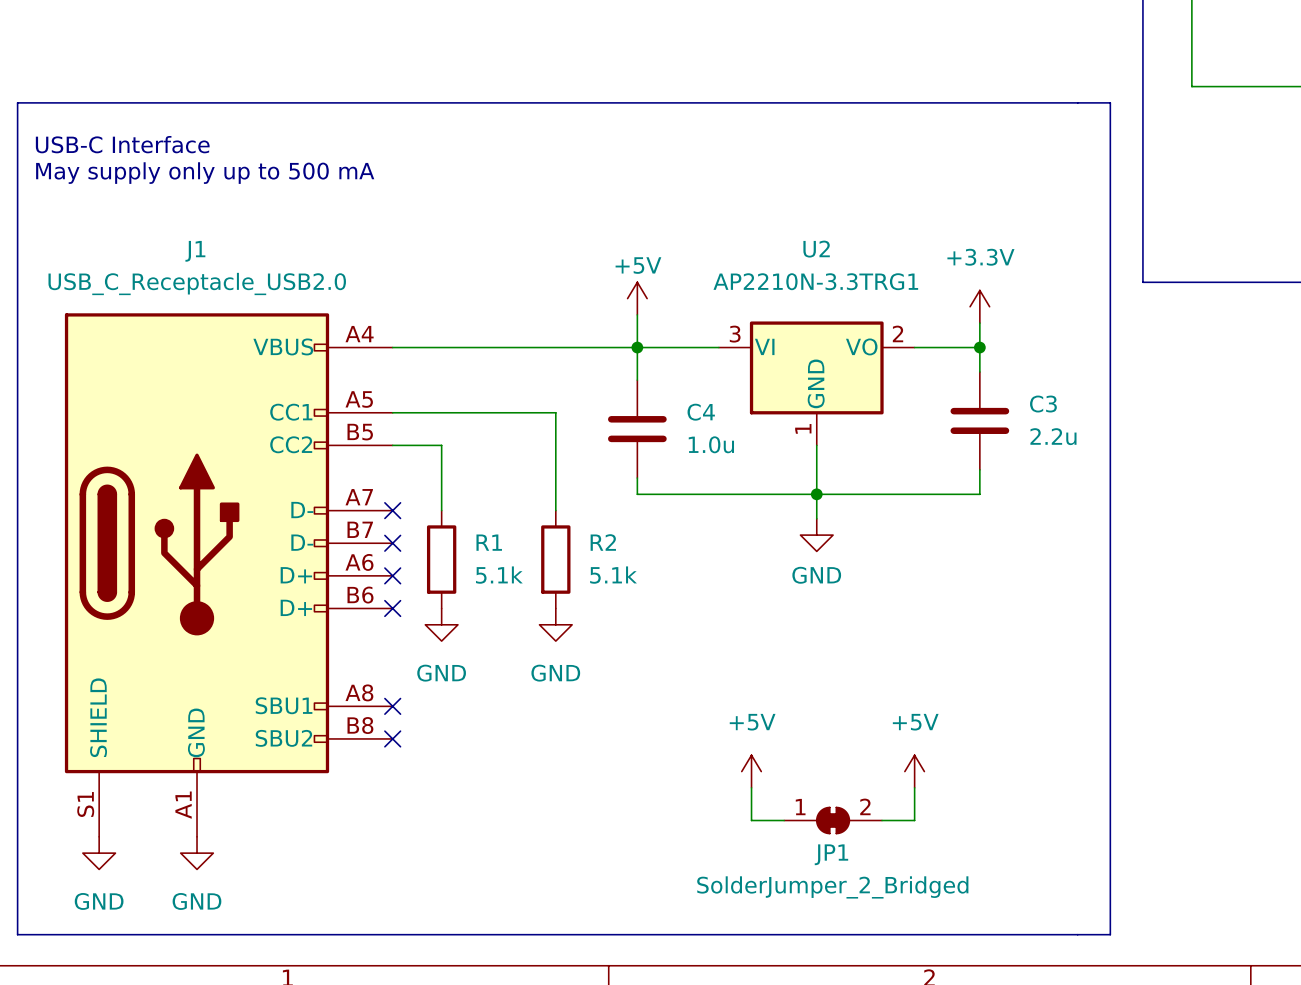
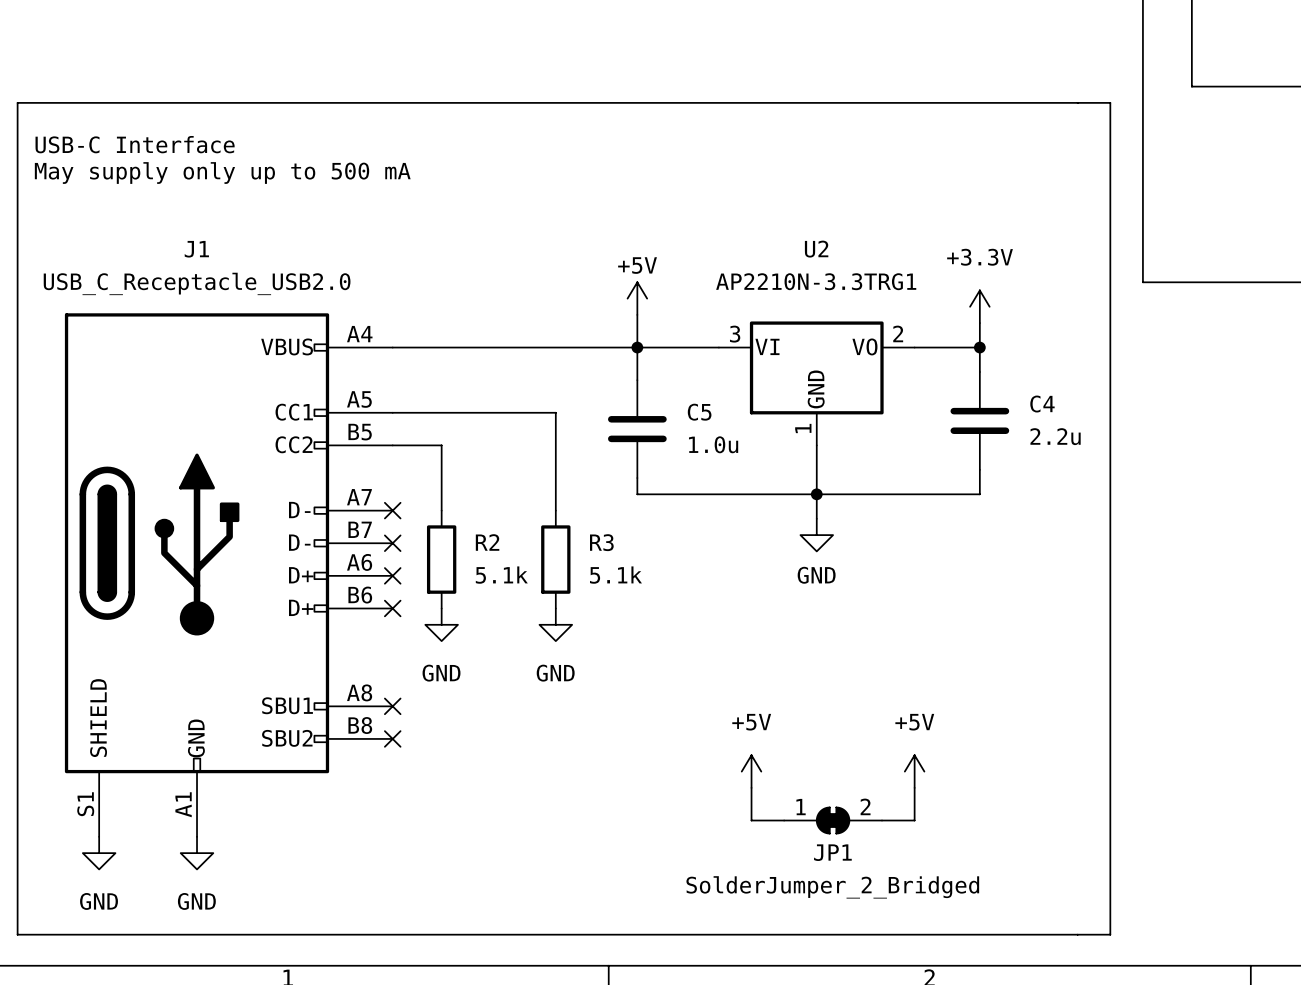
C3 name: C3 (1043, 404) -> C4 (1042, 404)
C4 name: C4 (701, 412) -> C5 (699, 412)
R1 name: R1 (489, 542) -> R2 (487, 542)
R2 name: R2 (603, 542) -> R3 (601, 542)

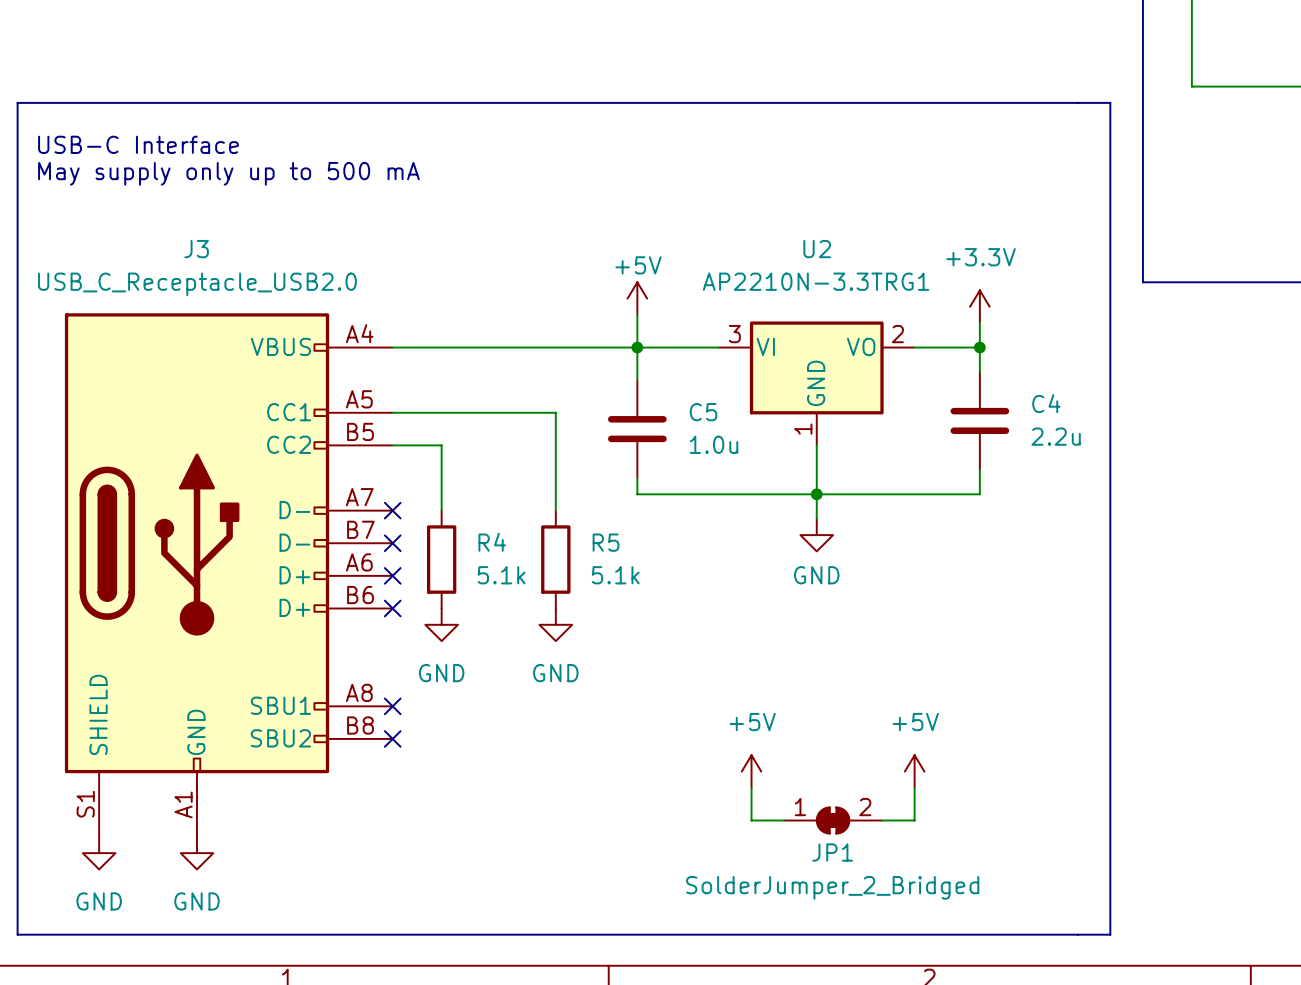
J1 name: J1 (196, 249) -> J3 (196, 249)
R2 name: R2 (487, 542) -> R4 (492, 542)
R3 name: R3 (601, 542) -> R5 (606, 542)

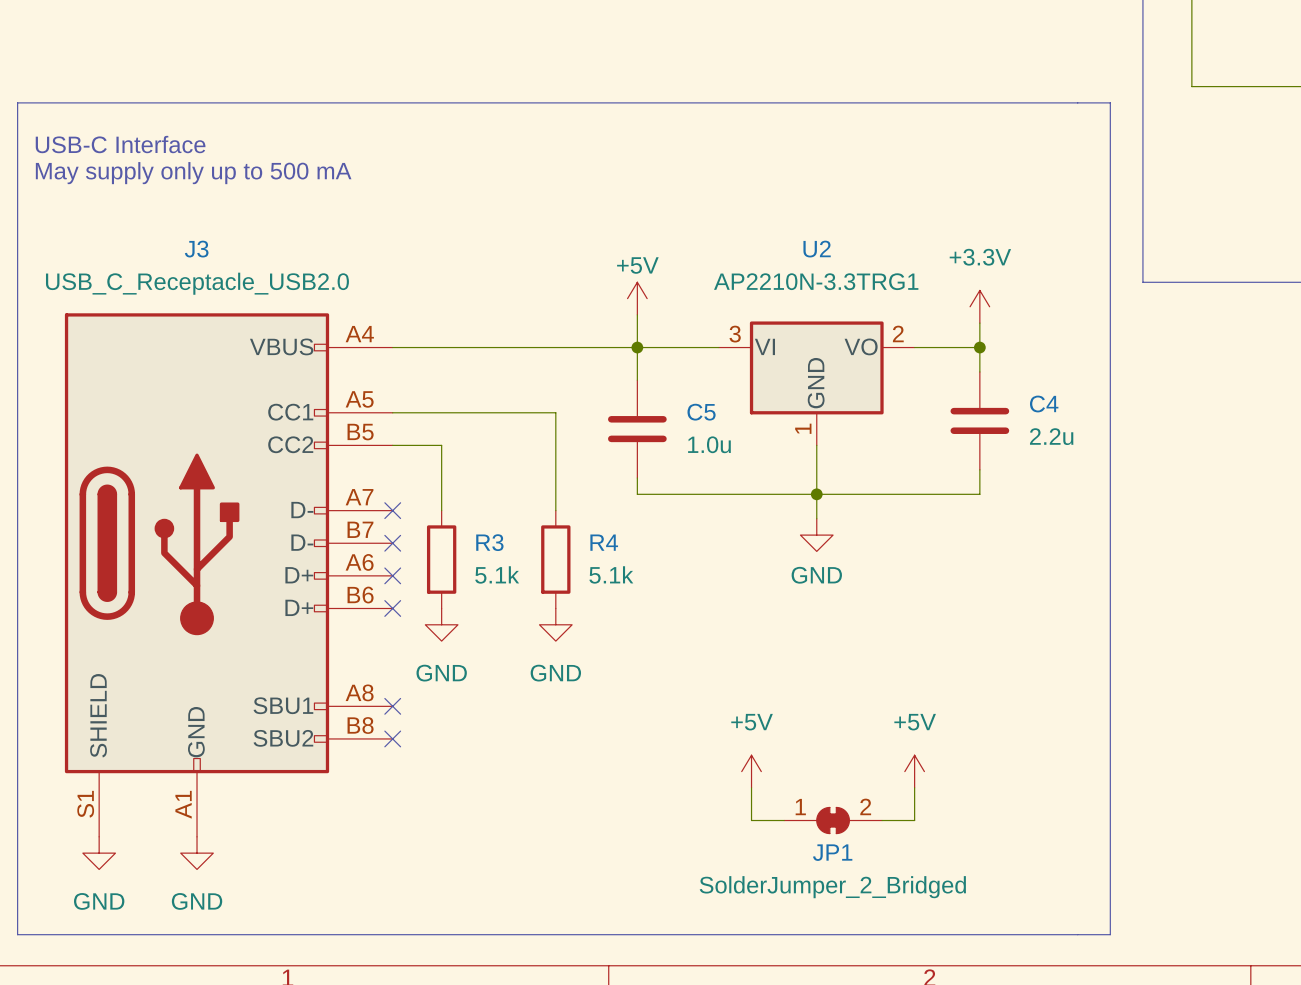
R4 name: R4 (492, 542) -> R3 (489, 542)
R5 name: R5 (606, 542) -> R4 (604, 542)

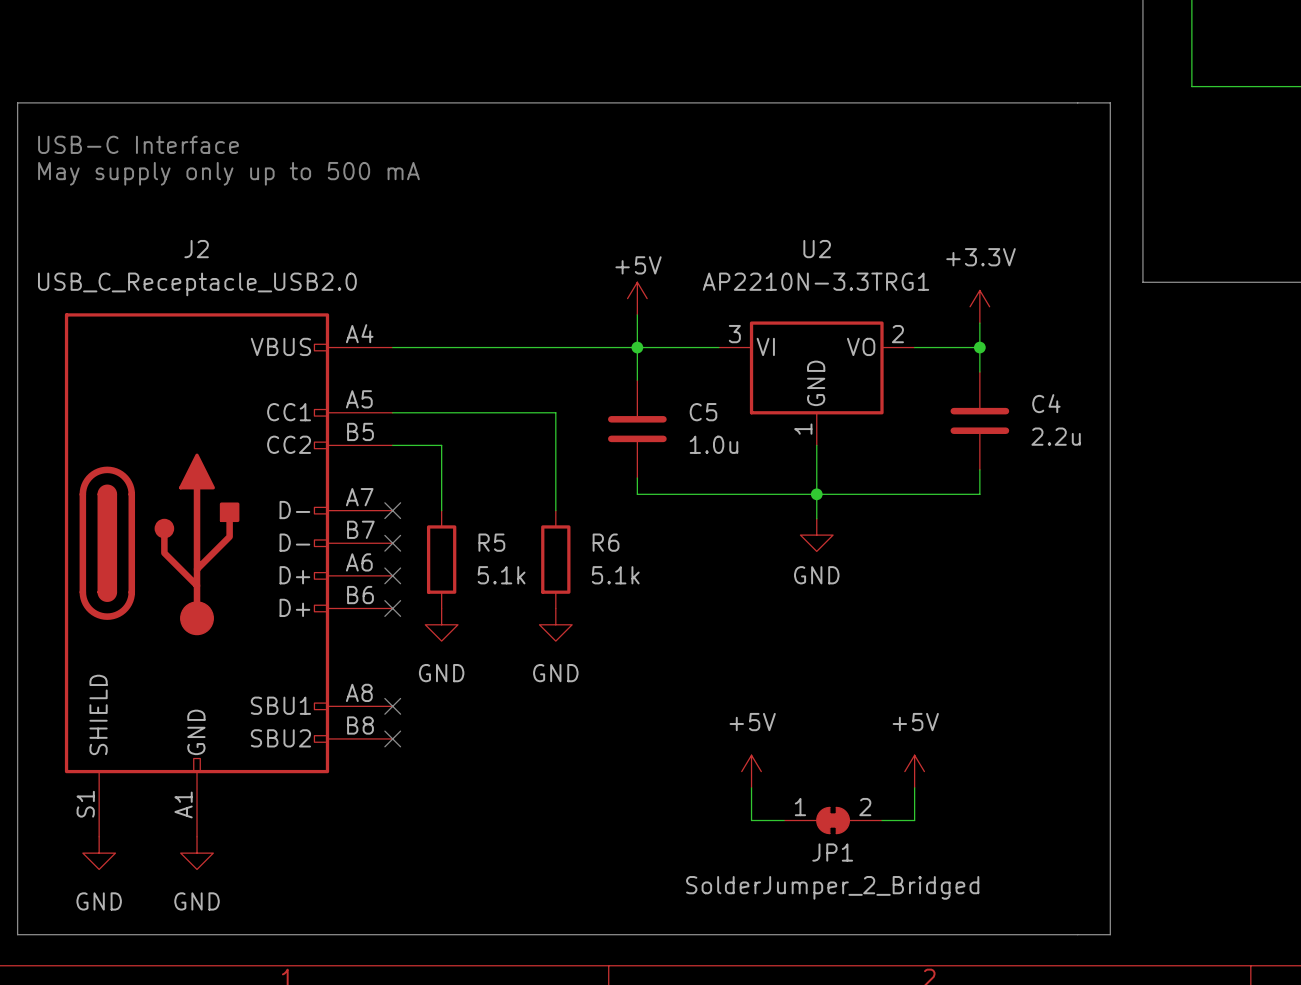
J3 name: J3 (196, 249) -> J2 (196, 249)
R3 name: R3 (489, 542) -> R5 (491, 542)
R4 name: R4 (604, 542) -> R6 (606, 542)

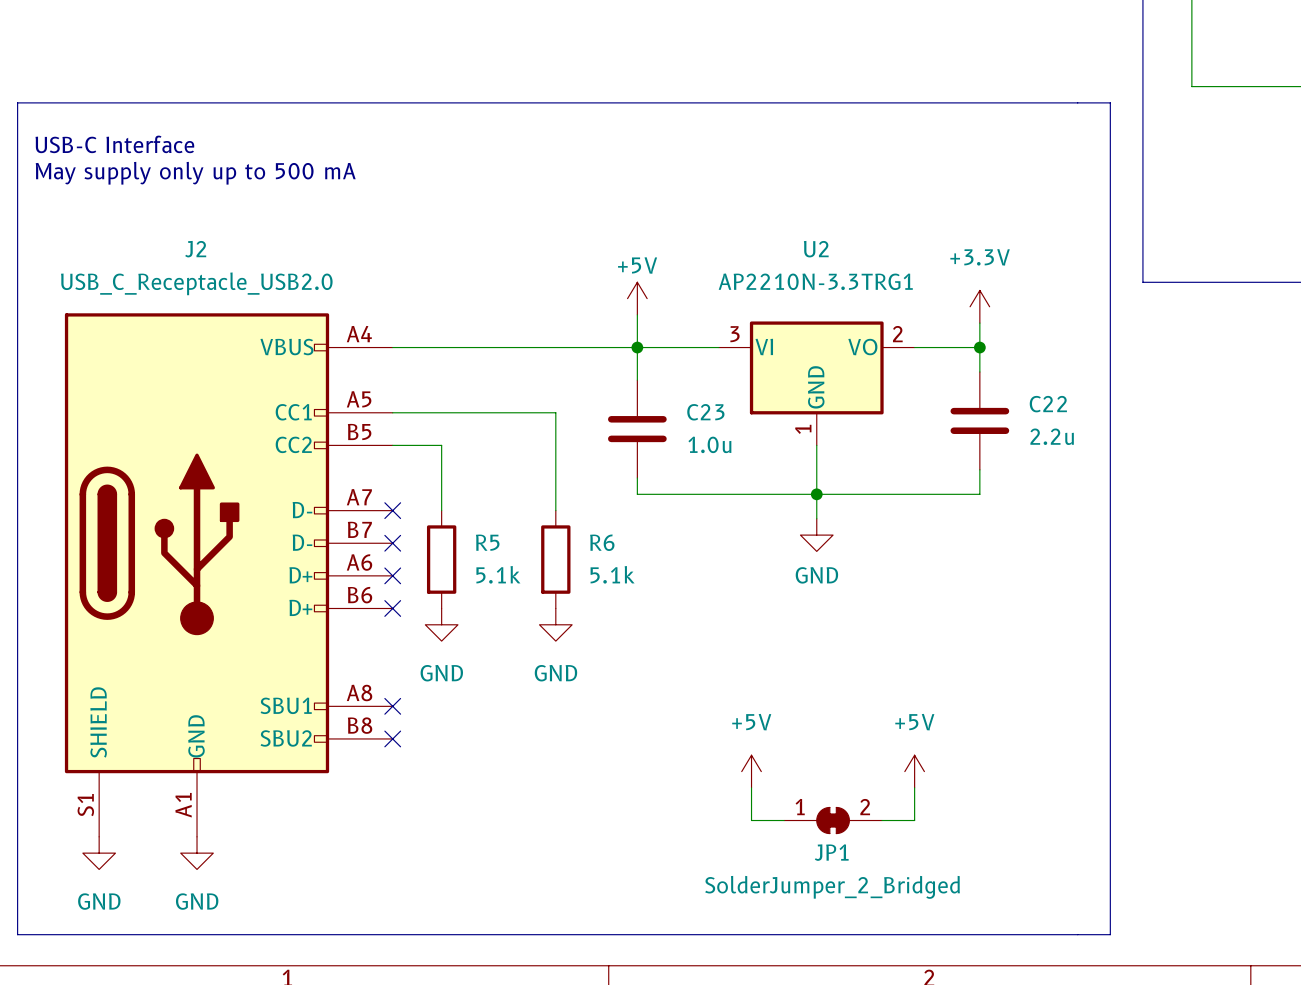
C4 name: C4 (1046, 403) -> C22 (1048, 404)
C5 name: C5 (703, 412) -> C23 (705, 412)

